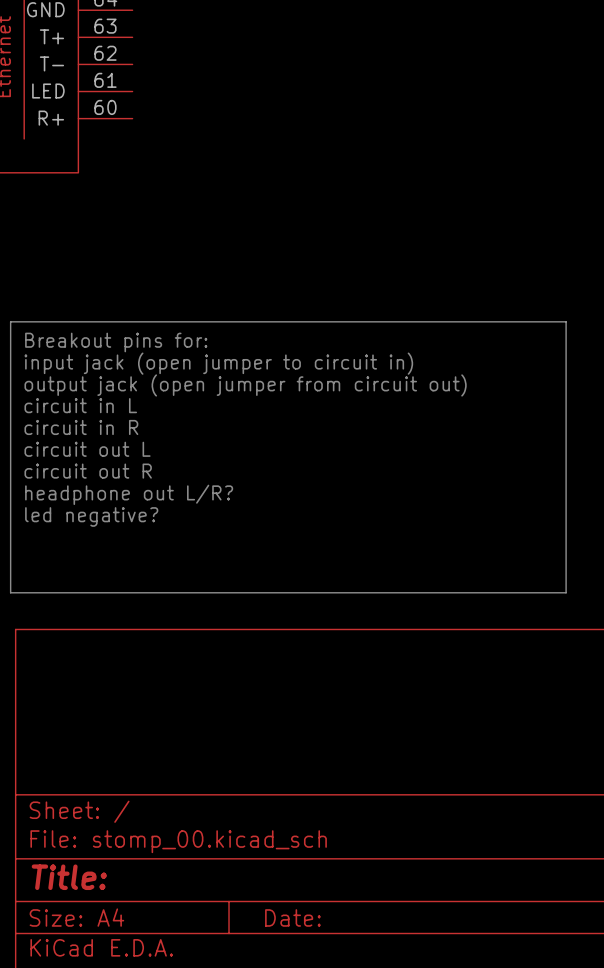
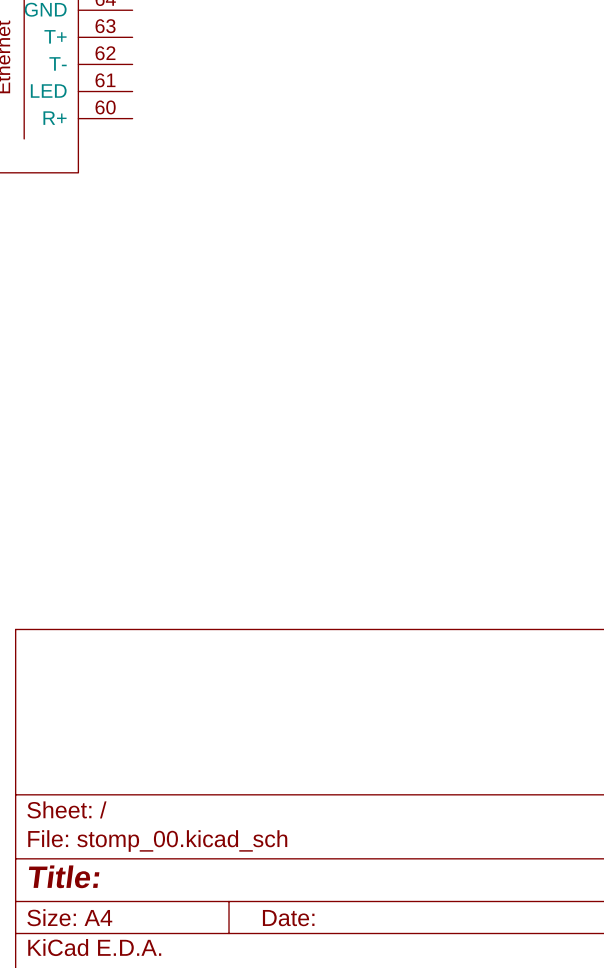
line: (10, 321) (566, 321) (566, 592) (10, 592) (10, 321) -> none
text: Breakout pins for: (116, 342) -> none
text: input jack (open jumper to circuit in) (218, 363) -> none
text: output jack (open jumper from circuit out) (245, 385) -> none
text: circuit in L (80, 405) -> none
text: circuit in R (81, 427) -> none
text: circuit out L (87, 449) -> none
text: circuit out R (88, 471) -> none
text: headphone out L/R? (129, 494) -> none
text: led negative? (91, 516) -> none

